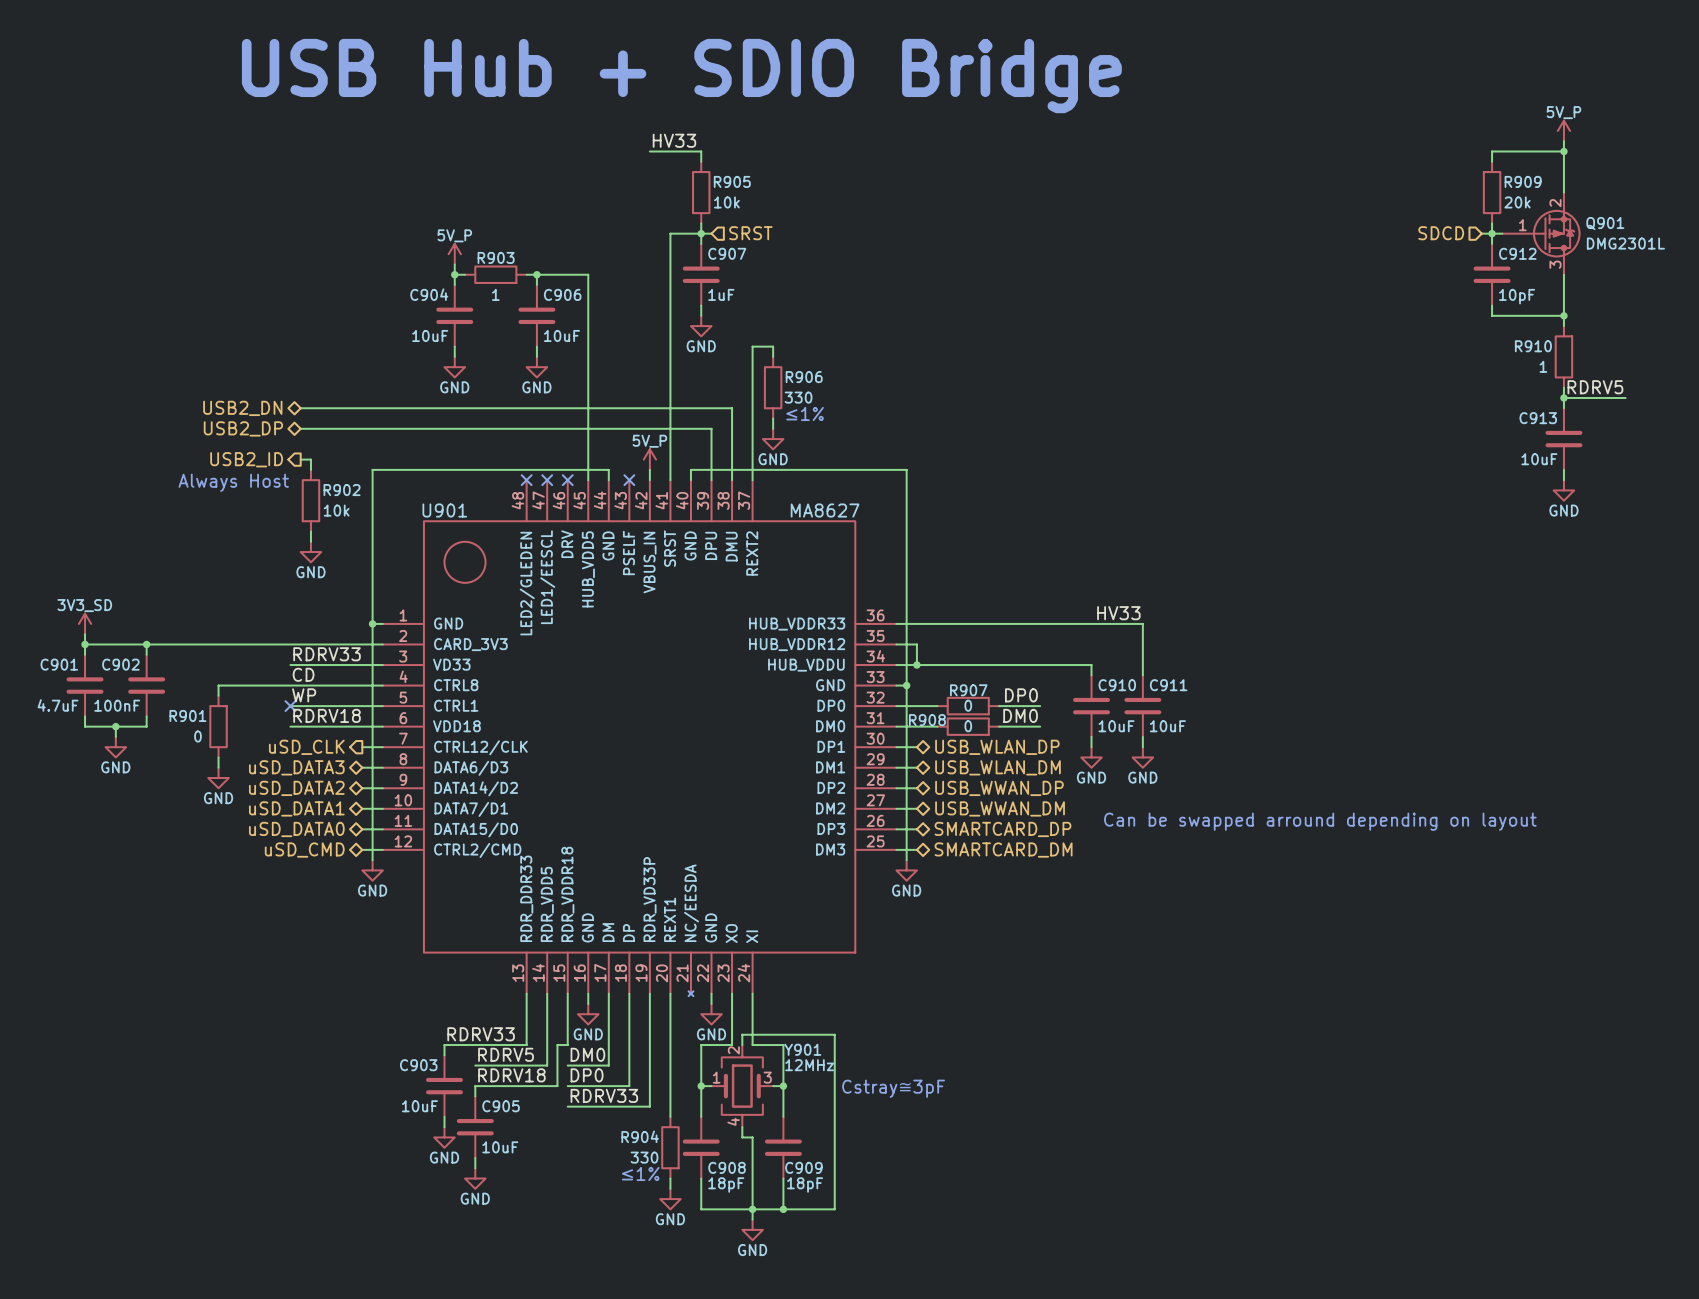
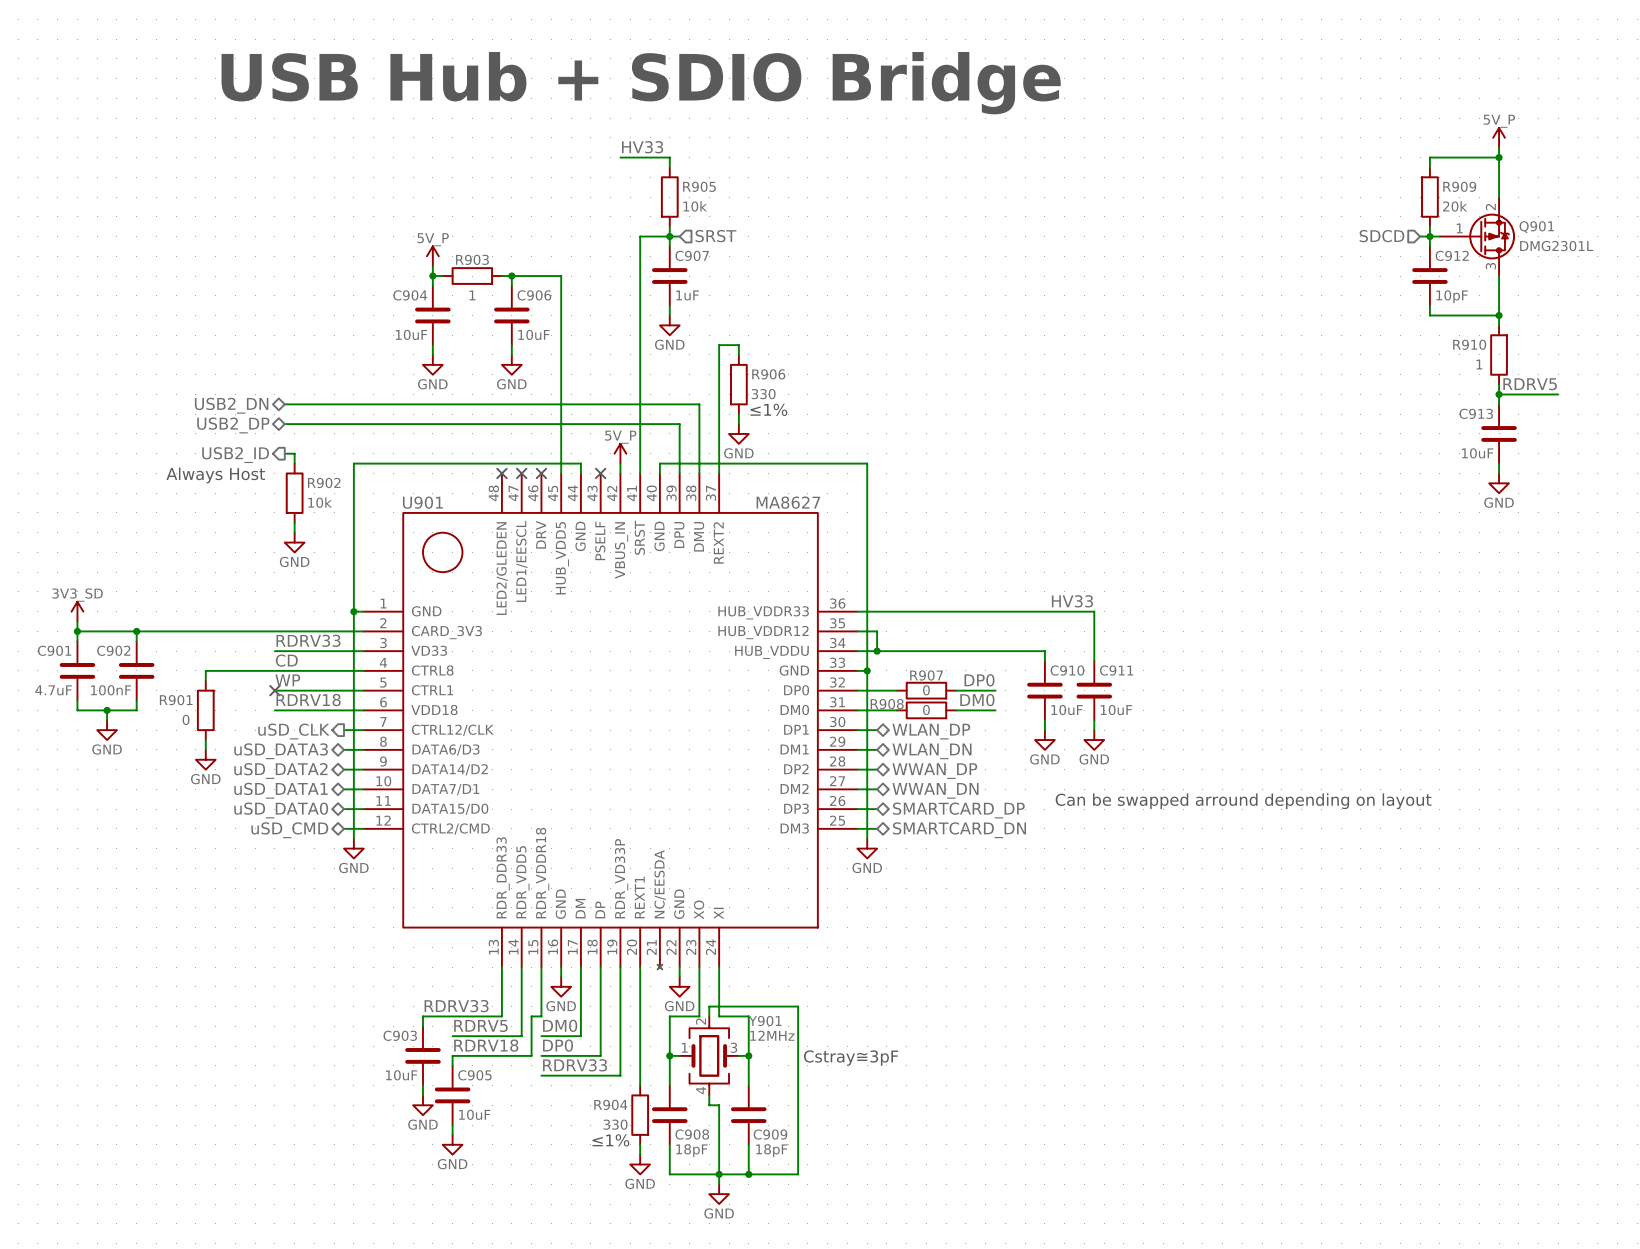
hierarchical label: USB_WLAN_DP (997, 747) -> WLAN_DP (931, 731)
hierarchical label: USB_WLAN_DM (997, 767) -> WLAN_DN (931, 751)
hierarchical label: USB_WWAN_DP (999, 788) -> WWAN_DP (934, 771)
hierarchical label: USB_WWAN_DM (1000, 808) -> WWAN_DN (935, 790)
hierarchical label: SMARTCARD_DM (1003, 850) -> SMARTCARD_DN (959, 830)

